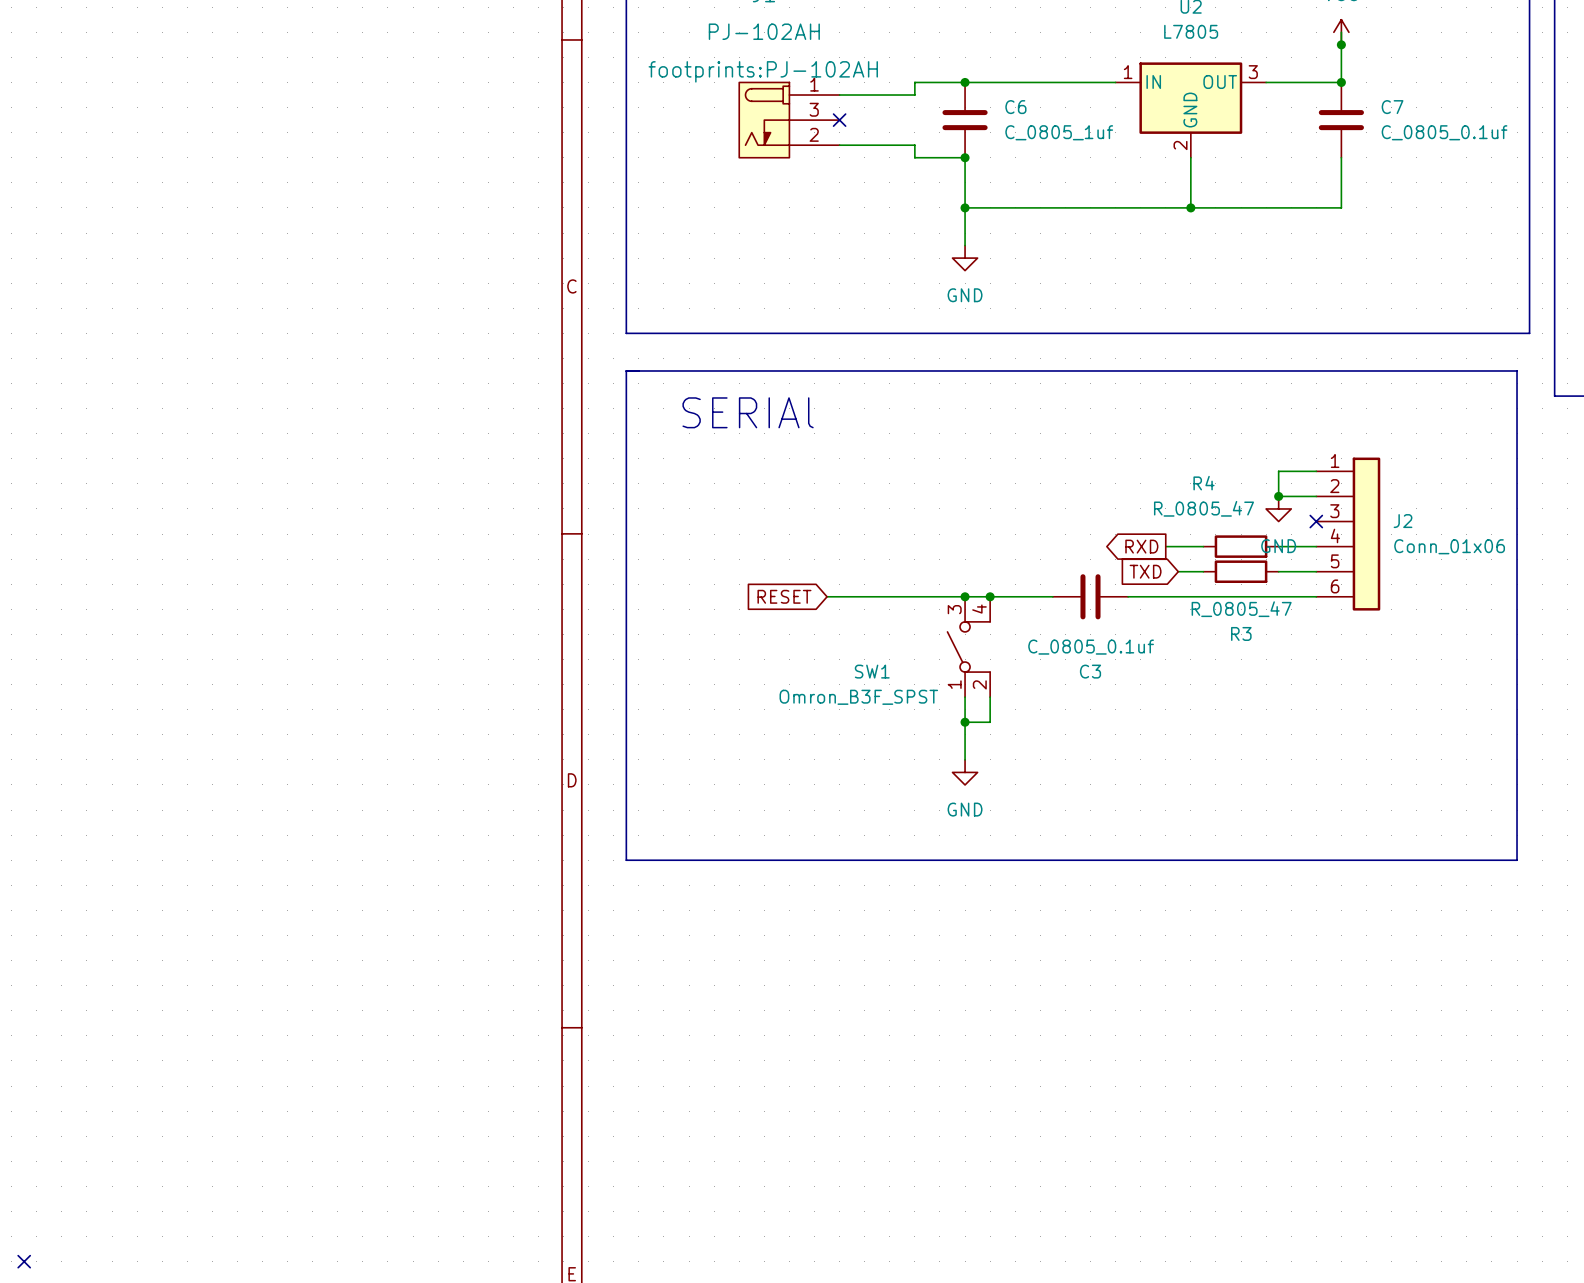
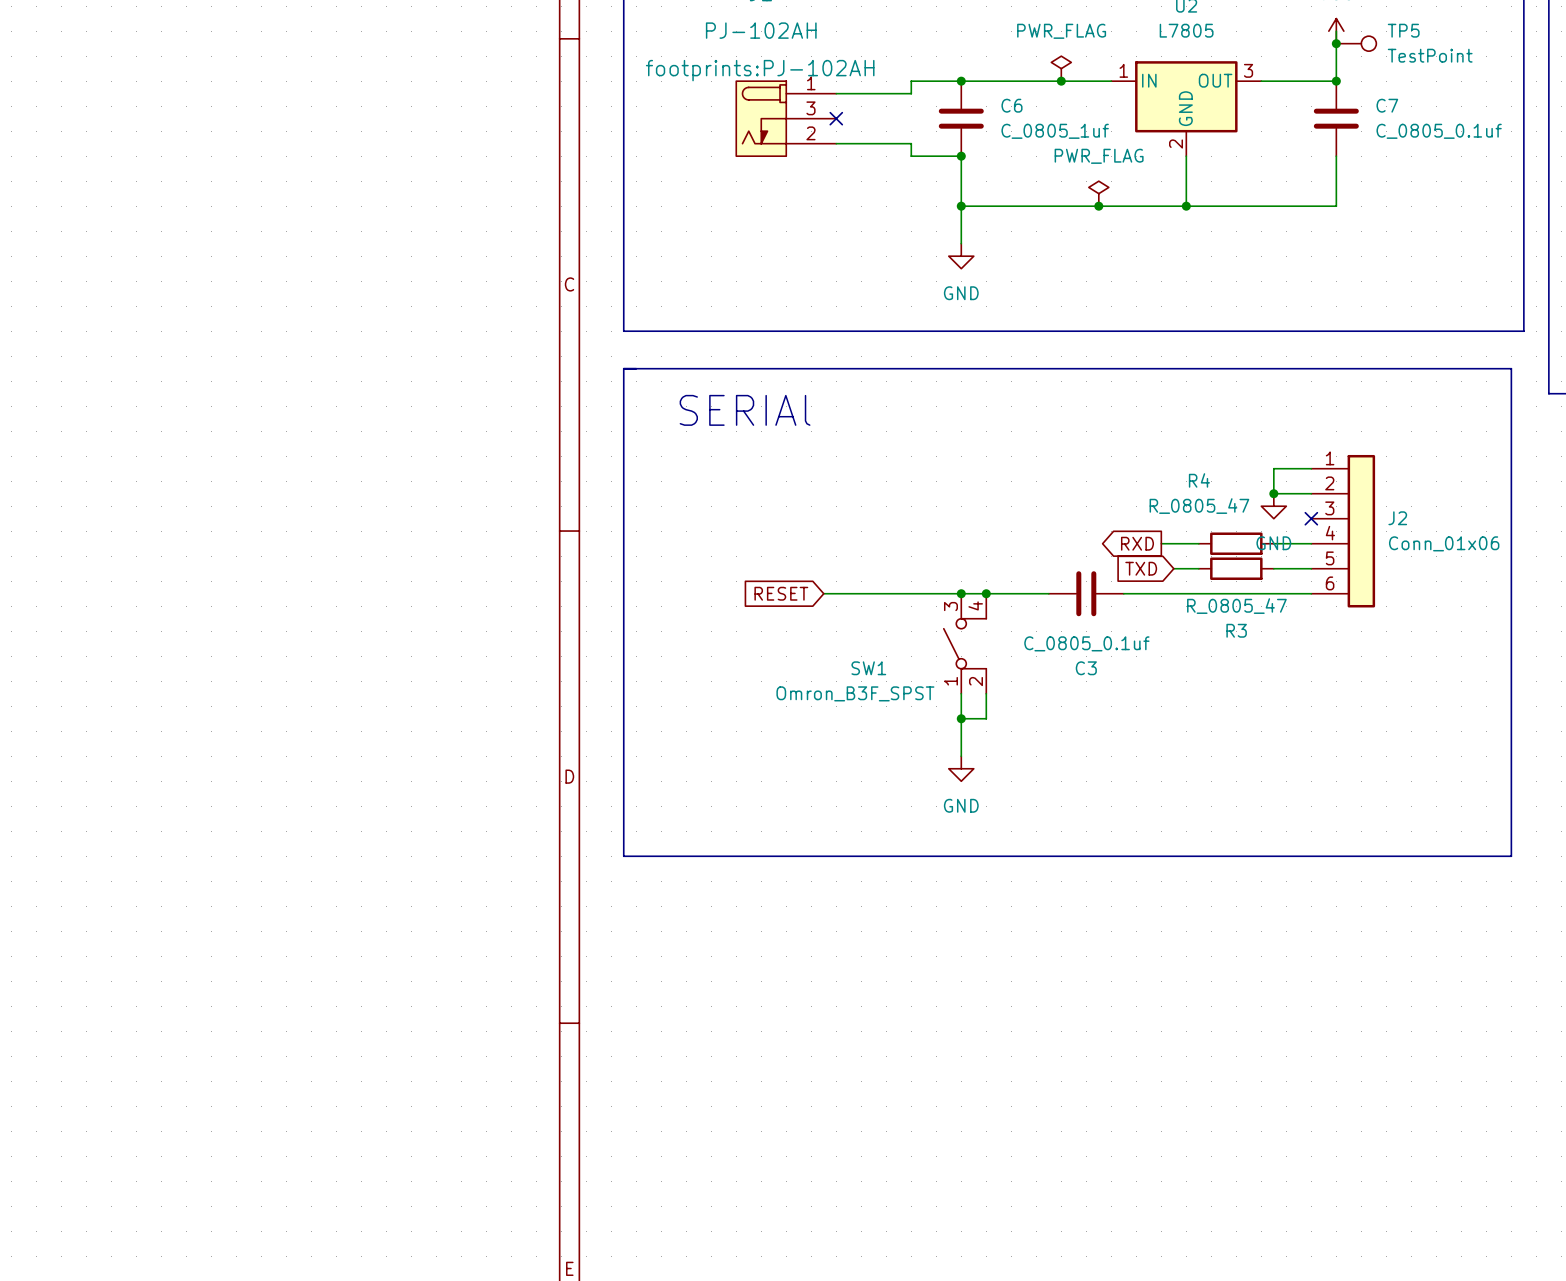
TP5: none -> TestPoint (1356, 43)
power symbol: none -> PWR_FLAG (1061, 68)
junction: none -> (1061, 81)
power symbol: none -> PWR_FLAG (1098, 193)
junction: none -> (1098, 206)
no-connect mark: (24, 1261) -> none

